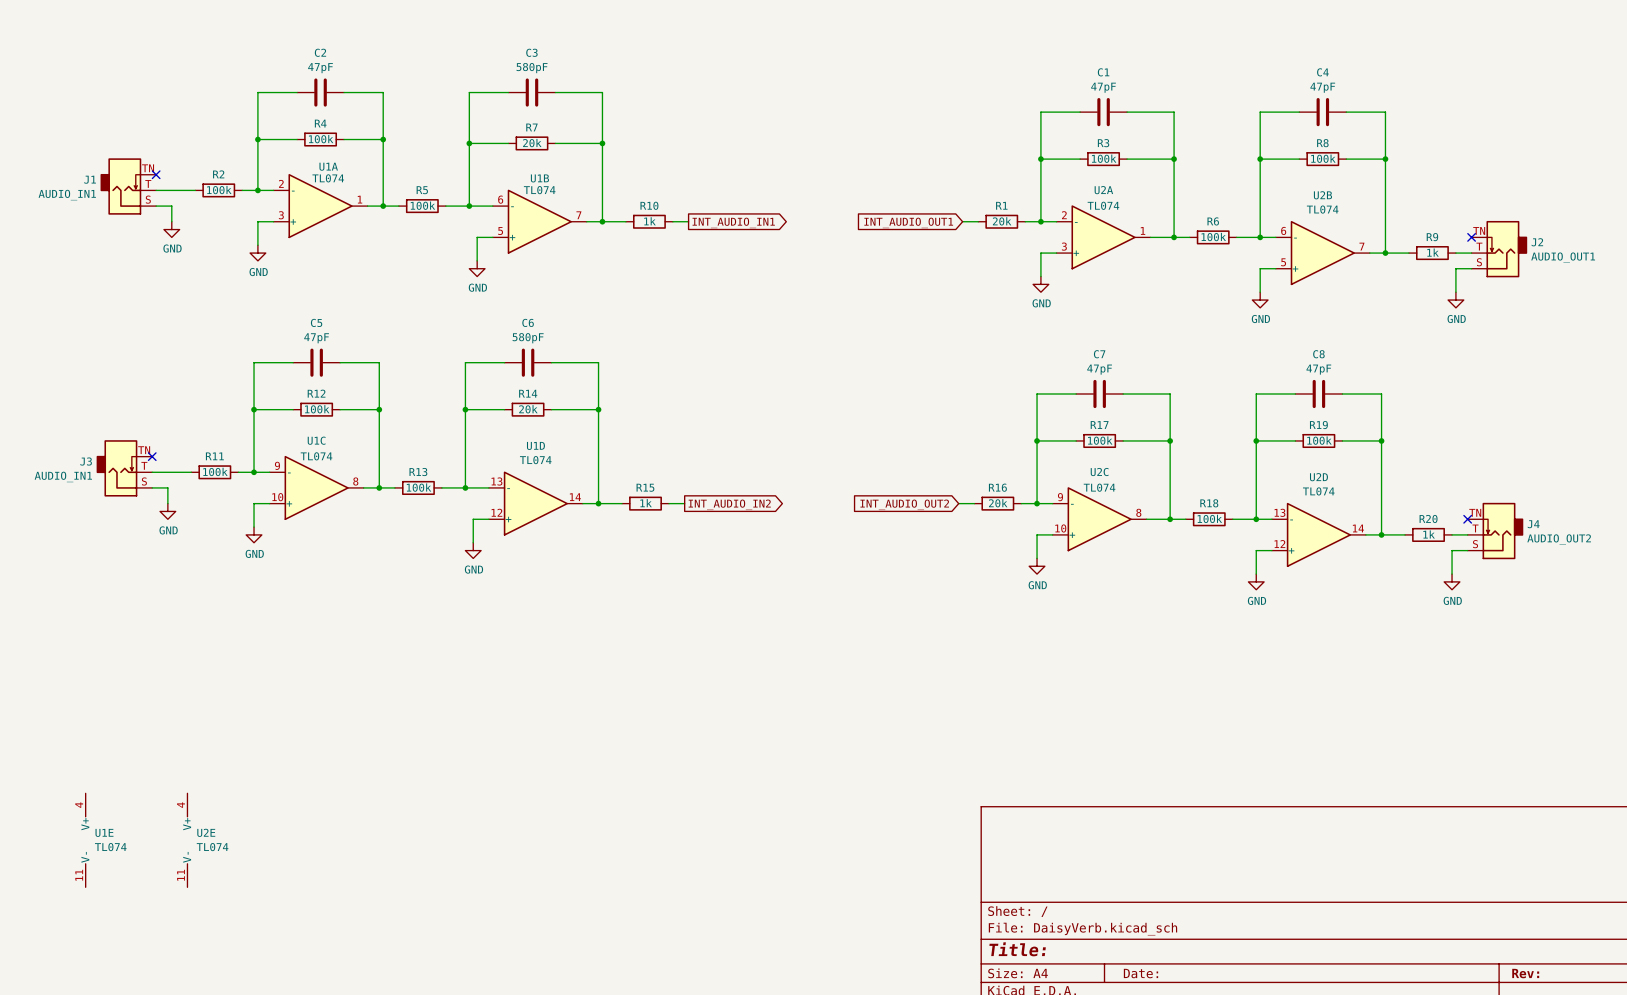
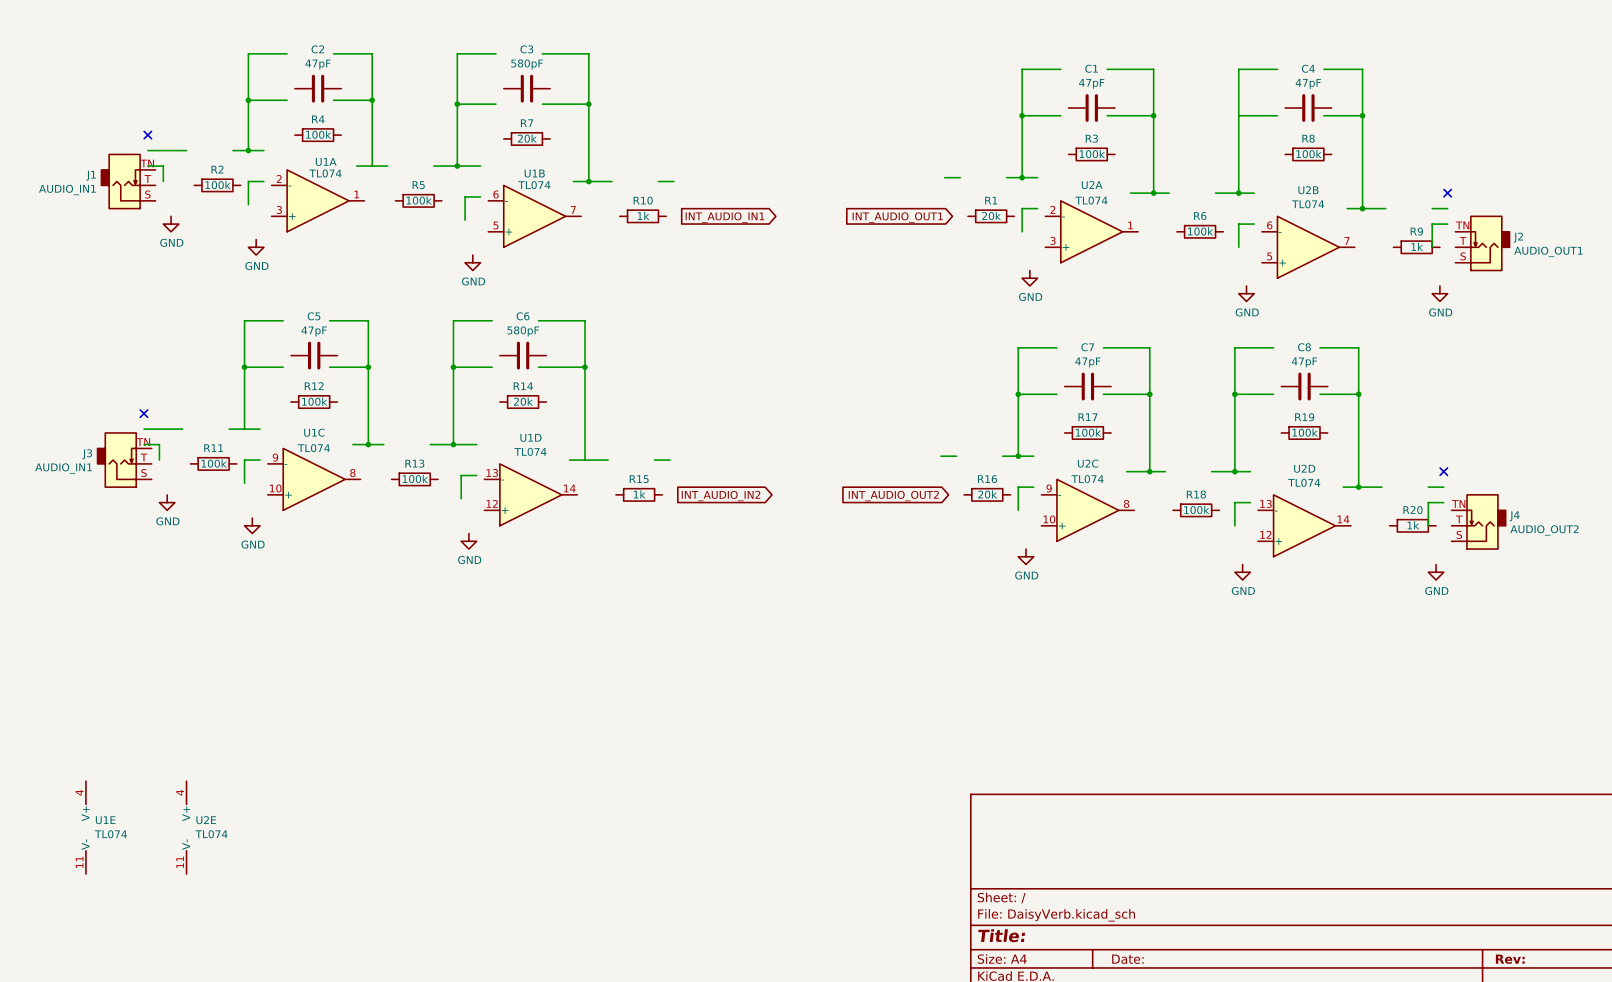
wire: none -> (496, 53) (457, 53) (457, 166)
wire: (297, 92) (257, 92) (257, 190) -> (287, 53) (248, 53) (248, 150)
wire: (344, 92) (383, 92) (383, 206) -> (333, 53) (372, 53) (372, 166)
wire: (508, 92) (469, 92) (469, 202) -> (480, 196) (465, 196)
wire: (555, 92) (602, 92) (602, 221) -> (542, 53) (588, 53) (588, 181)
junction: none -> (248, 100)
junction: none -> (457, 104)
junction: none -> (588, 104)
wire: (1080, 112) (1040, 112) (1040, 221) -> (1060, 69) (1022, 69) (1022, 177)
wire: (1127, 112) (1174, 112) (1174, 237) -> (1107, 69) (1153, 69) (1153, 193)
wire: (1299, 112) (1260, 112) (1260, 237) -> (1277, 69) (1238, 69) (1238, 193)
wire: (1346, 112) (1385, 112) (1385, 253) -> (1323, 69) (1362, 69) (1362, 208)
junction: none -> (1022, 115)
junction: none -> (1153, 115)
junction: none -> (1362, 115)
wire: (257, 139) (297, 139) -> (248, 100) (287, 100)
junction position: (257, 139) -> (248, 150)
wire: (344, 139) (383, 139) -> (333, 100) (372, 100)
junction position: (383, 139) -> (372, 100)
wire: (469, 143) (508, 143) -> (457, 104) (496, 104)
junction: (469, 143) -> none
wire: (555, 143) (602, 143) -> (542, 104) (588, 104)
junction: (602, 143) -> none
wire: (1040, 159) (1080, 159) -> (1022, 115) (1060, 115)
junction: (1040, 159) -> none
wire: (1127, 159) (1174, 159) -> (1107, 115) (1153, 115)
junction: (1174, 159) -> none
wire: (1260, 159) (1299, 159) -> (1238, 115) (1277, 115)
junction: (1260, 159) -> none
wire: (1346, 159) (1385, 159) -> (1323, 115) (1362, 115)
junction: (1385, 159) -> none
junction: none -> (457, 166)
no-connect mark position: (156, 174) -> (147, 135)
junction: none -> (1022, 177)
junction: none -> (588, 181)
wire: (156, 190) (195, 190) -> (147, 150) (186, 150)
wire: (242, 190) (273, 190) -> (232, 150) (263, 150)
junction: (257, 190) -> none
junction: none -> (1153, 193)
junction: none -> (1238, 193)
no-connect mark: none -> (1447, 193)
wire: (156, 206) (171, 206) (171, 221) -> (147, 166) (163, 166) (163, 181)
wire: (367, 206) (398, 206) -> (356, 166) (387, 166)
junction: (383, 206) -> none
wire: (445, 206) (492, 206) -> (434, 166) (480, 166)
wire: none -> (465, 200) (465, 220)
junction: (469, 206) -> none
junction: none -> (1362, 208)
wire: (273, 221) (257, 221) (257, 245) -> (263, 181) (248, 181) (248, 204)
wire: (586, 221) (625, 221) -> (573, 181) (612, 181)
junction: (602, 221) -> none
wire: (672, 221) (688, 221) -> (658, 181) (673, 181)
wire: (962, 221) (978, 221) -> (944, 177) (960, 177)
wire: (1025, 221) (1056, 221) -> (1006, 177) (1037, 177)
junction: (1040, 221) -> none
wire: (492, 237) (477, 237) (477, 260) -> none
wire: (1150, 237) (1189, 237) -> (1130, 193) (1169, 193)
junction: (1174, 237) -> none
wire: (1236, 237) (1275, 237) -> (1215, 193) (1254, 193)
junction: (1260, 237) -> none
no-connect mark: (1471, 237) -> none
wire: (1056, 253) (1040, 253) (1040, 276) -> (1037, 208) (1022, 208) (1022, 231)
wire: (1369, 253) (1408, 253) -> (1347, 208) (1385, 208)
junction: (1385, 253) -> none
wire: (1455, 253) (1471, 253) -> (1432, 208) (1447, 208)
wire: (1275, 268) (1260, 268) (1260, 292) -> (1254, 224) (1238, 224) (1238, 247)
wire: (1471, 268) (1455, 268) (1455, 292) -> (1447, 224) (1432, 224) (1432, 247)
wire: none -> (492, 320) (453, 320) (453, 444)
wire: (293, 362) (254, 362) (254, 472) -> (283, 320) (244, 320) (244, 429)
wire: (340, 362) (379, 362) (379, 487) -> (329, 320) (368, 320) (368, 444)
wire: (504, 362) (465, 362) (465, 484) -> (476, 475) (461, 475)
wire: (551, 362) (598, 362) (598, 503) -> (538, 320) (584, 320) (584, 460)
junction: none -> (368, 367)
junction: none -> (453, 367)
wire: (1076, 393) (1037, 393) (1037, 503) -> (1056, 347) (1018, 347) (1018, 456)
wire: (1123, 393) (1170, 393) (1170, 519) -> (1103, 347) (1149, 347) (1149, 471)
wire: (1295, 393) (1256, 393) (1256, 519) -> (1273, 347) (1234, 347) (1234, 471)
wire: (1342, 393) (1381, 393) (1381, 534) -> (1320, 347) (1358, 347) (1358, 487)
junction: none -> (1018, 394)
junction: none -> (1149, 394)
junction: none -> (1234, 394)
junction: none -> (1358, 394)
wire: (254, 409) (293, 409) -> (244, 367) (283, 367)
junction position: (254, 409) -> (244, 367)
wire: (340, 409) (379, 409) -> (329, 367) (368, 367)
junction: (379, 409) -> none
wire: (465, 409) (504, 409) -> (453, 367) (492, 367)
junction: (465, 409) -> none
wire: (551, 409) (598, 409) -> (538, 367) (584, 367)
junction position: (598, 409) -> (584, 367)
wire: (1037, 440) (1076, 440) -> (1018, 394) (1056, 394)
junction: (1037, 440) -> none
wire: (1123, 440) (1170, 440) -> (1103, 394) (1149, 394)
junction: (1170, 440) -> none
wire: (1256, 440) (1295, 440) -> (1234, 394) (1273, 394)
junction: (1256, 440) -> none
wire: (1342, 440) (1381, 440) -> (1320, 394) (1358, 394)
junction: (1381, 440) -> none
junction: none -> (368, 444)
junction: none -> (453, 444)
no-connect mark position: (152, 456) -> (143, 413)
junction: none -> (1018, 456)
wire: (152, 472) (191, 472) -> (143, 429) (182, 429)
wire: (238, 472) (269, 472) -> (229, 429) (260, 429)
junction: (254, 472) -> none
junction: none -> (1149, 471)
junction: none -> (1234, 471)
no-connect mark: none -> (1443, 471)
wire: (152, 487) (167, 487) (167, 503) -> (143, 444) (159, 444) (159, 460)
wire: (363, 487) (394, 487) -> (352, 444) (383, 444)
junction: (379, 487) -> none
wire: (441, 487) (488, 487) -> (430, 444) (476, 444)
wire: none -> (461, 479) (461, 498)
junction: (465, 487) -> none
junction: none -> (1358, 487)
wire: (269, 503) (254, 503) (254, 527) -> (260, 460) (244, 460) (244, 483)
wire: (582, 503) (622, 503) -> (569, 460) (608, 460)
junction: (598, 503) -> none
wire: (669, 503) (684, 503) -> (654, 460) (670, 460)
wire: (958, 503) (974, 503) -> (940, 456) (956, 456)
wire: (1021, 503) (1052, 503) -> (1002, 456) (1033, 456)
junction: (1037, 503) -> none
wire: (488, 519) (473, 519) (473, 542) -> none
wire: (1146, 519) (1185, 519) -> (1126, 471) (1165, 471)
junction: (1170, 519) -> none
wire: (1232, 519) (1271, 519) -> (1211, 471) (1250, 471)
junction: (1256, 519) -> none
no-connect mark: (1467, 519) -> none
wire: (1052, 534) (1037, 534) (1037, 558) -> (1033, 487) (1018, 487) (1018, 510)
wire: (1365, 534) (1405, 534) -> (1343, 487) (1381, 487)
junction: (1381, 534) -> none
wire: (1452, 534) (1467, 534) -> (1428, 487) (1443, 487)
wire: (1271, 550) (1256, 550) (1256, 574) -> (1250, 502) (1234, 502) (1234, 525)
wire: (1467, 550) (1452, 550) (1452, 574) -> (1443, 502) (1428, 502) (1428, 525)

